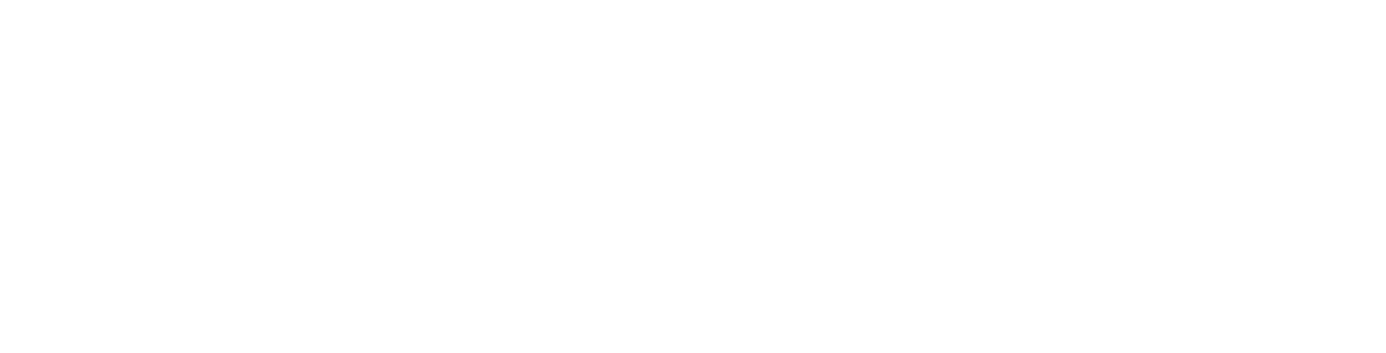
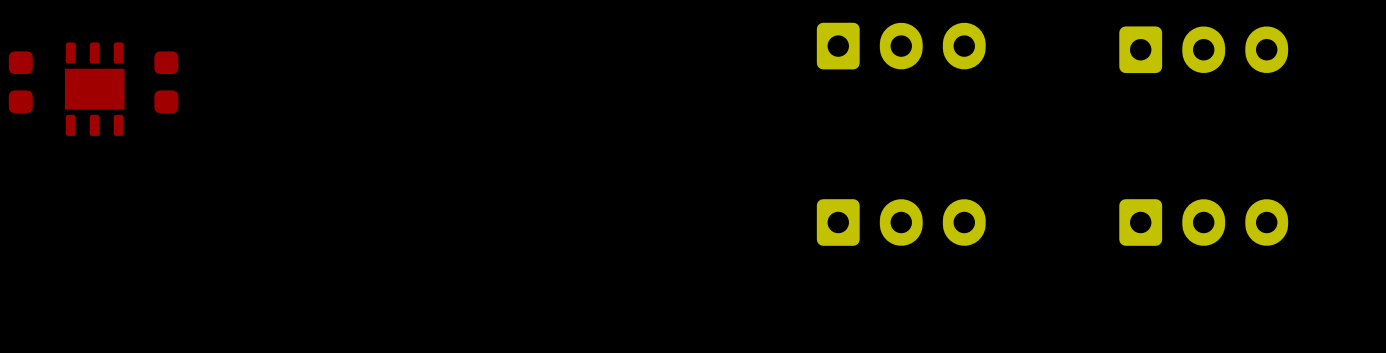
part: none -> (901, 46)
part: none -> (1203, 49)
part: none -> (20, 82)
part: none -> (166, 82)
part: none -> (94, 89)
part: none -> (901, 222)
part: none -> (1203, 222)

